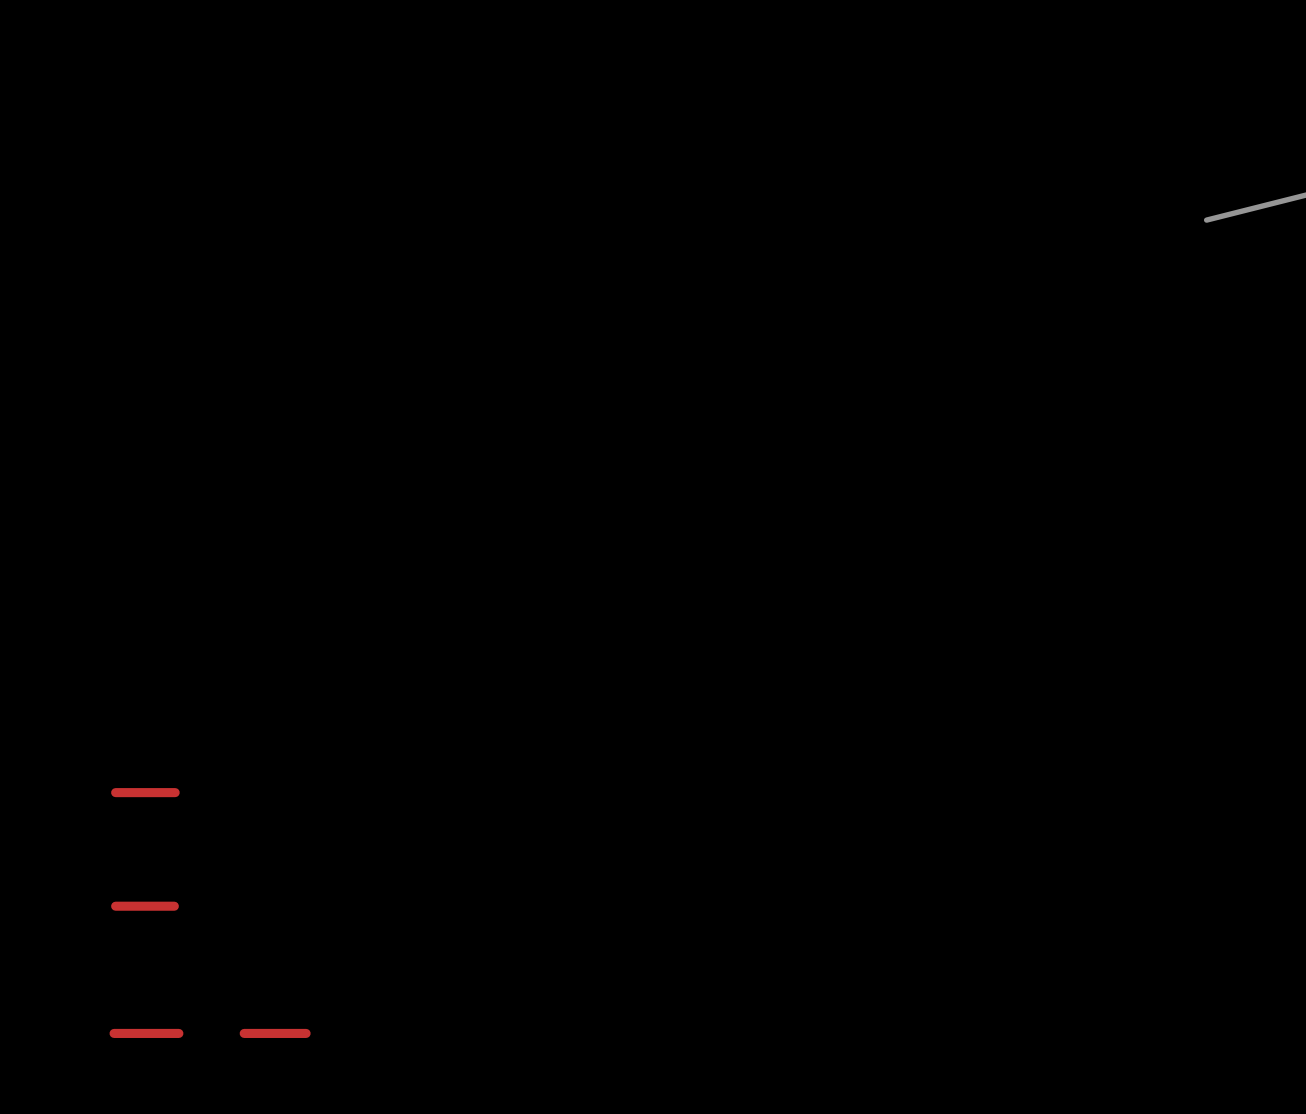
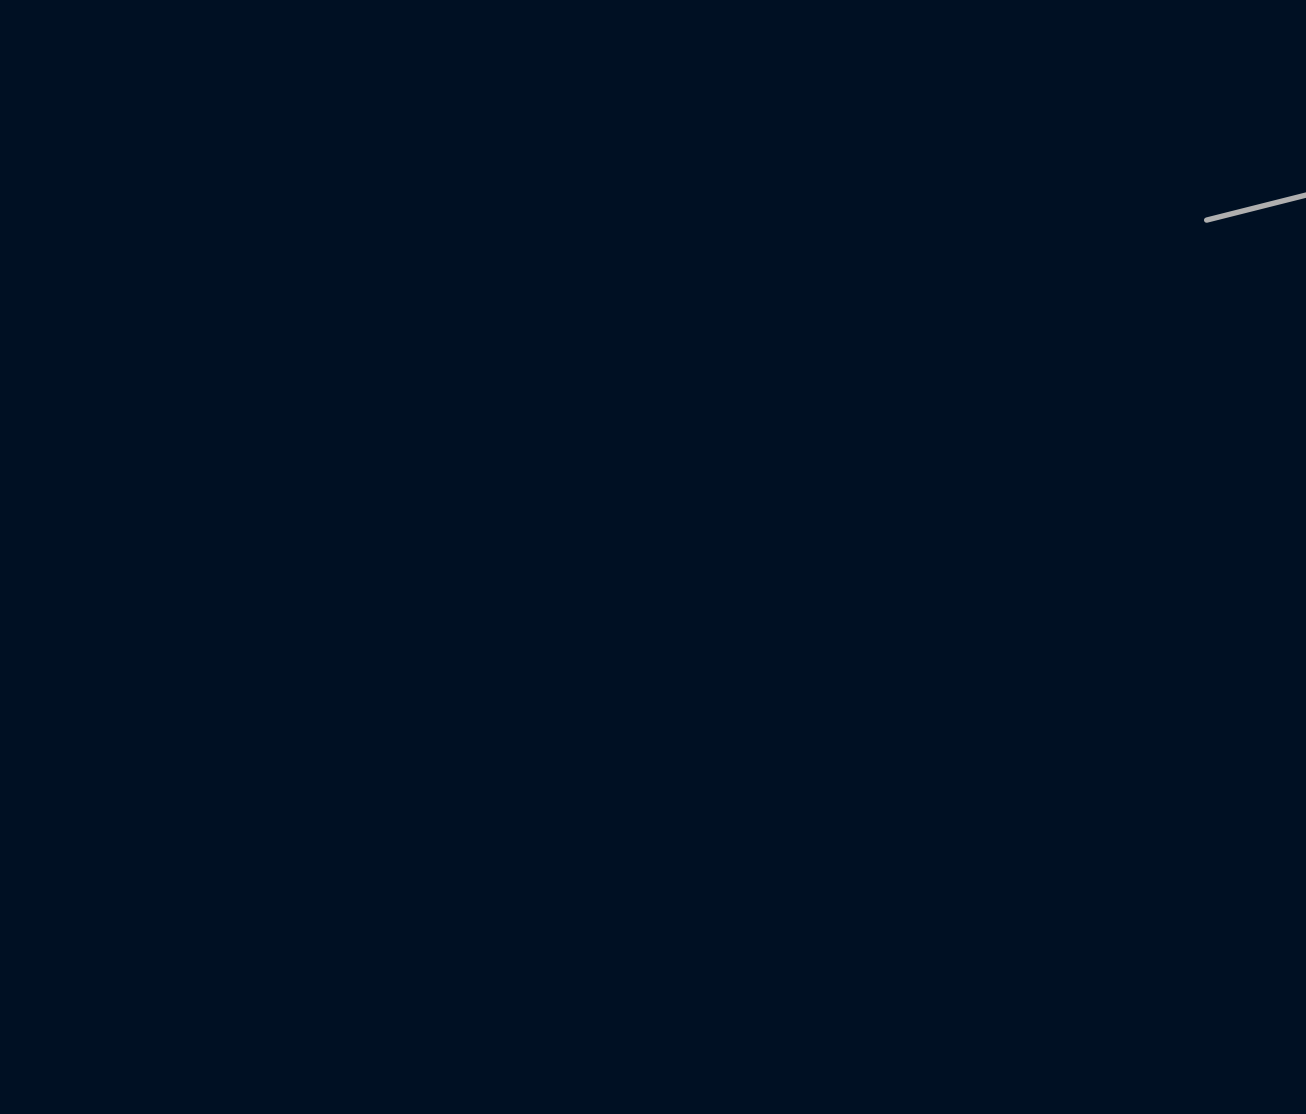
top track: (115, 792) (175, 792) -> none
top track: (115, 906) (174, 906) -> none
top track: (114, 1033) (178, 1033) -> none
top track: (244, 1033) (306, 1033) -> none

